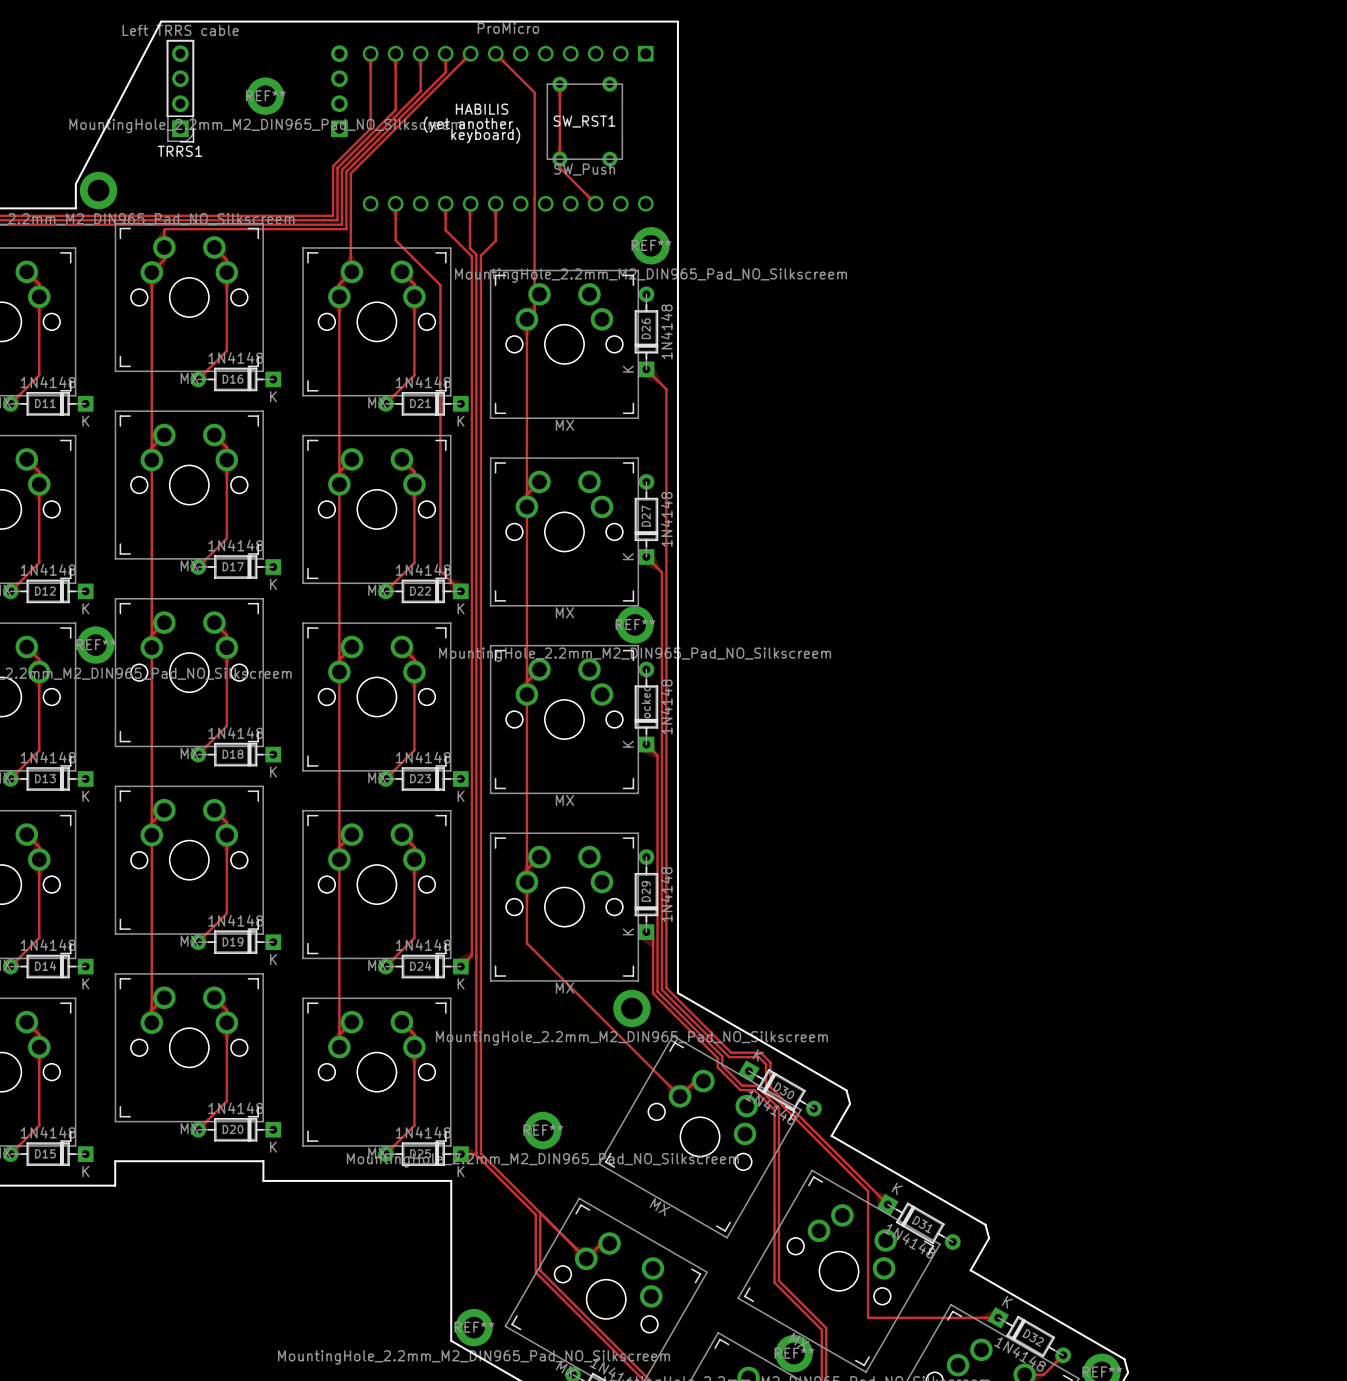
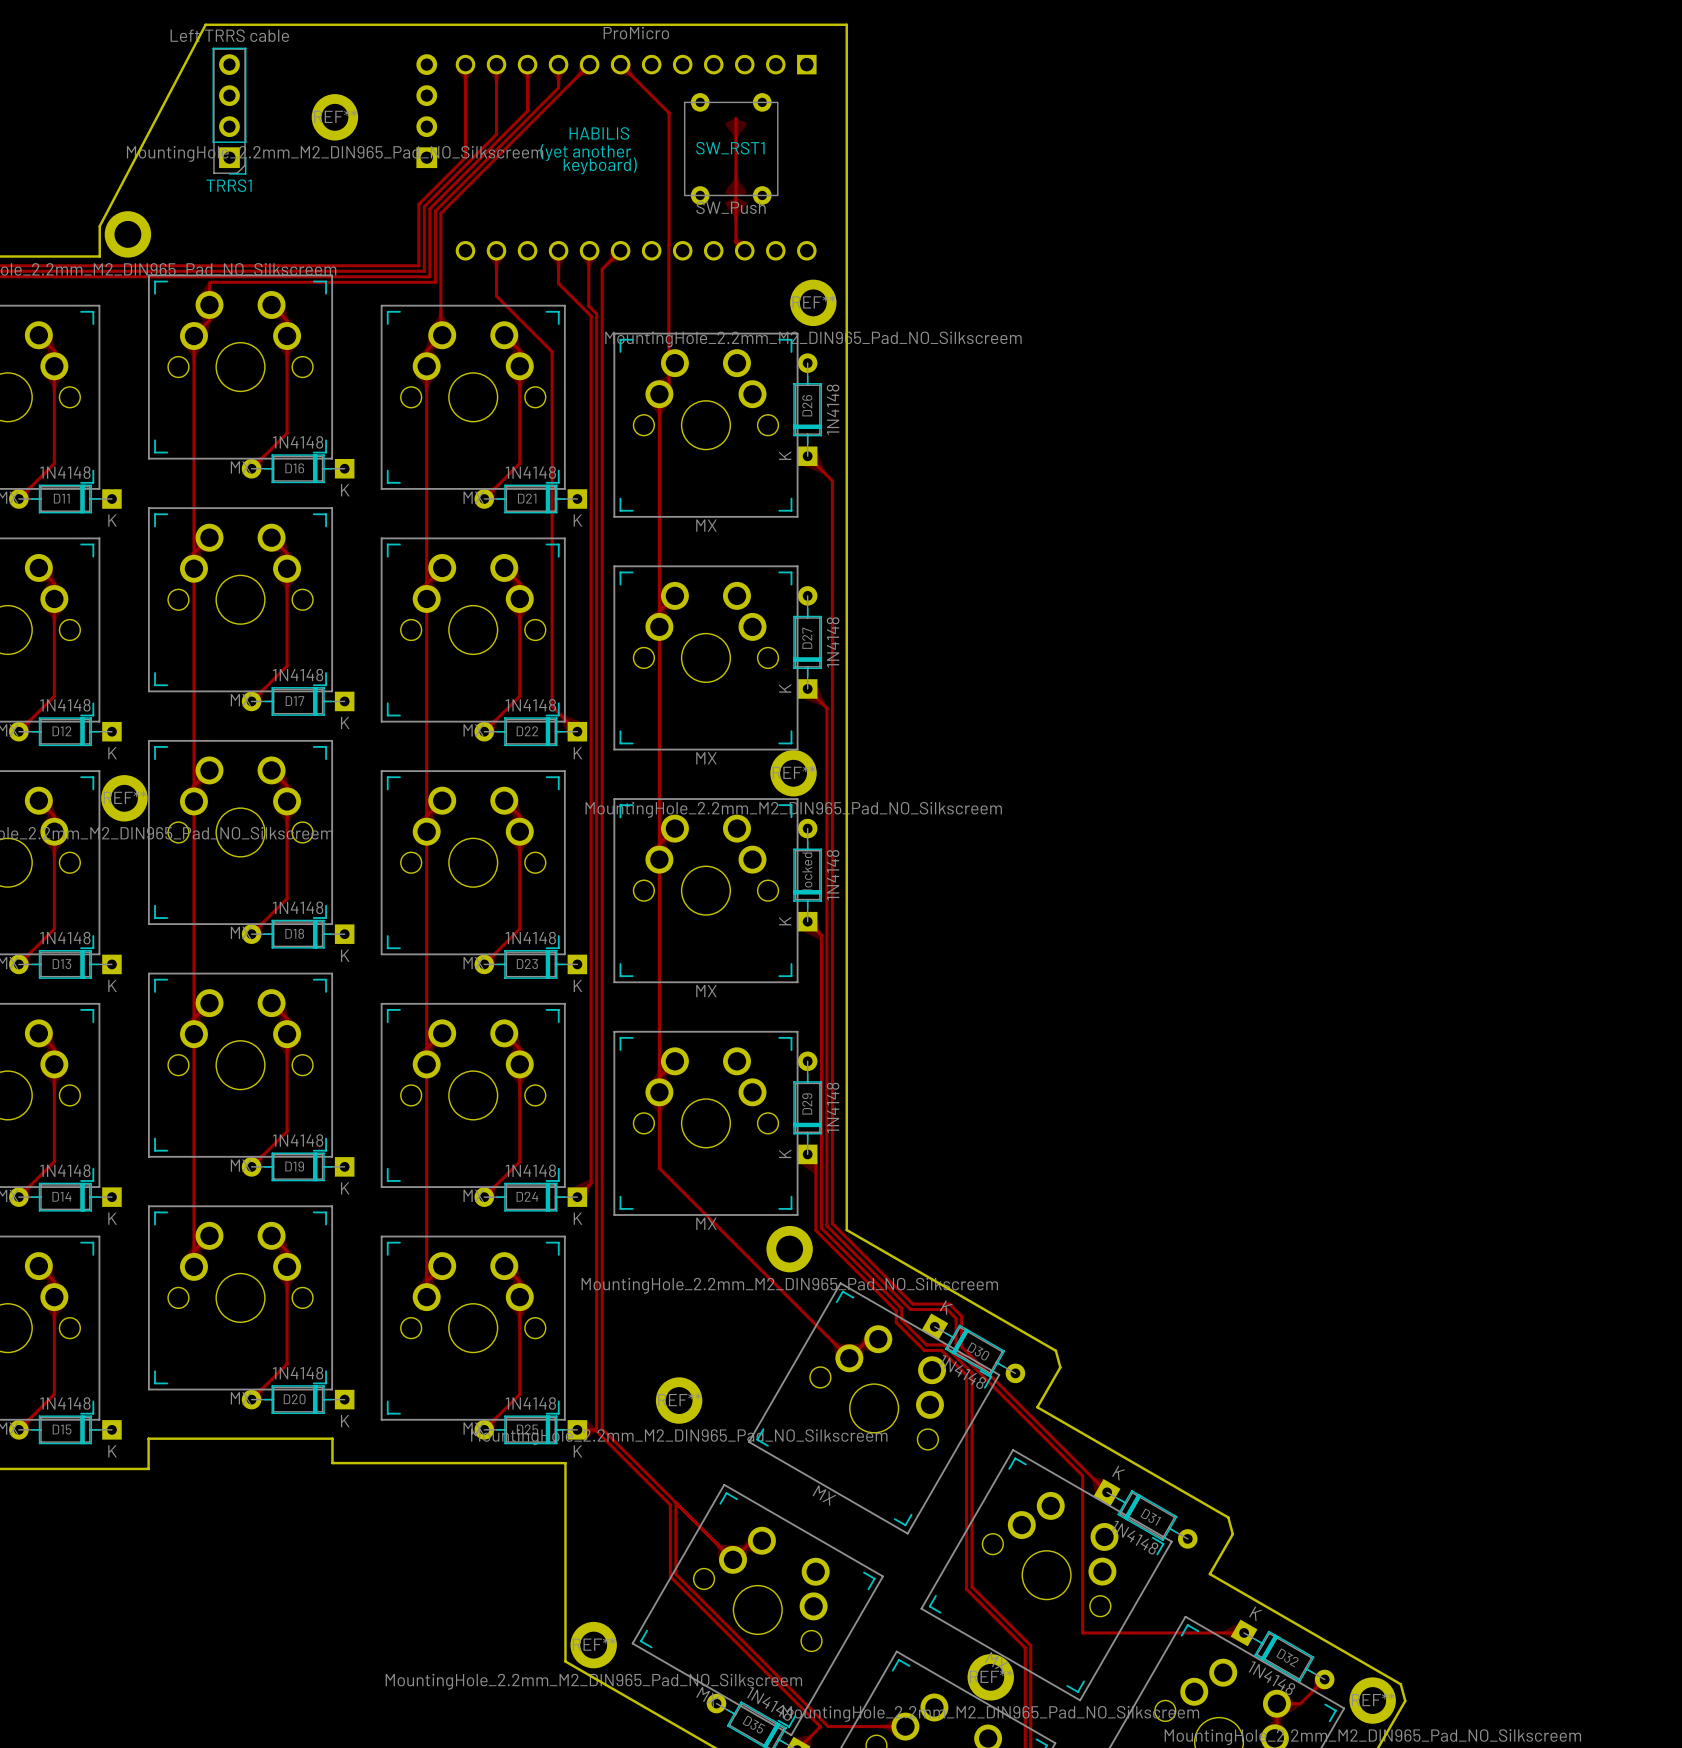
track: (559, 84) (559, 167) (588, 196) -> (735, 118) (735, 241)
track: (495, 203) (495, 240) (480, 255) (480, 1153) -> (620, 250) (602, 269) (602, 1428)

